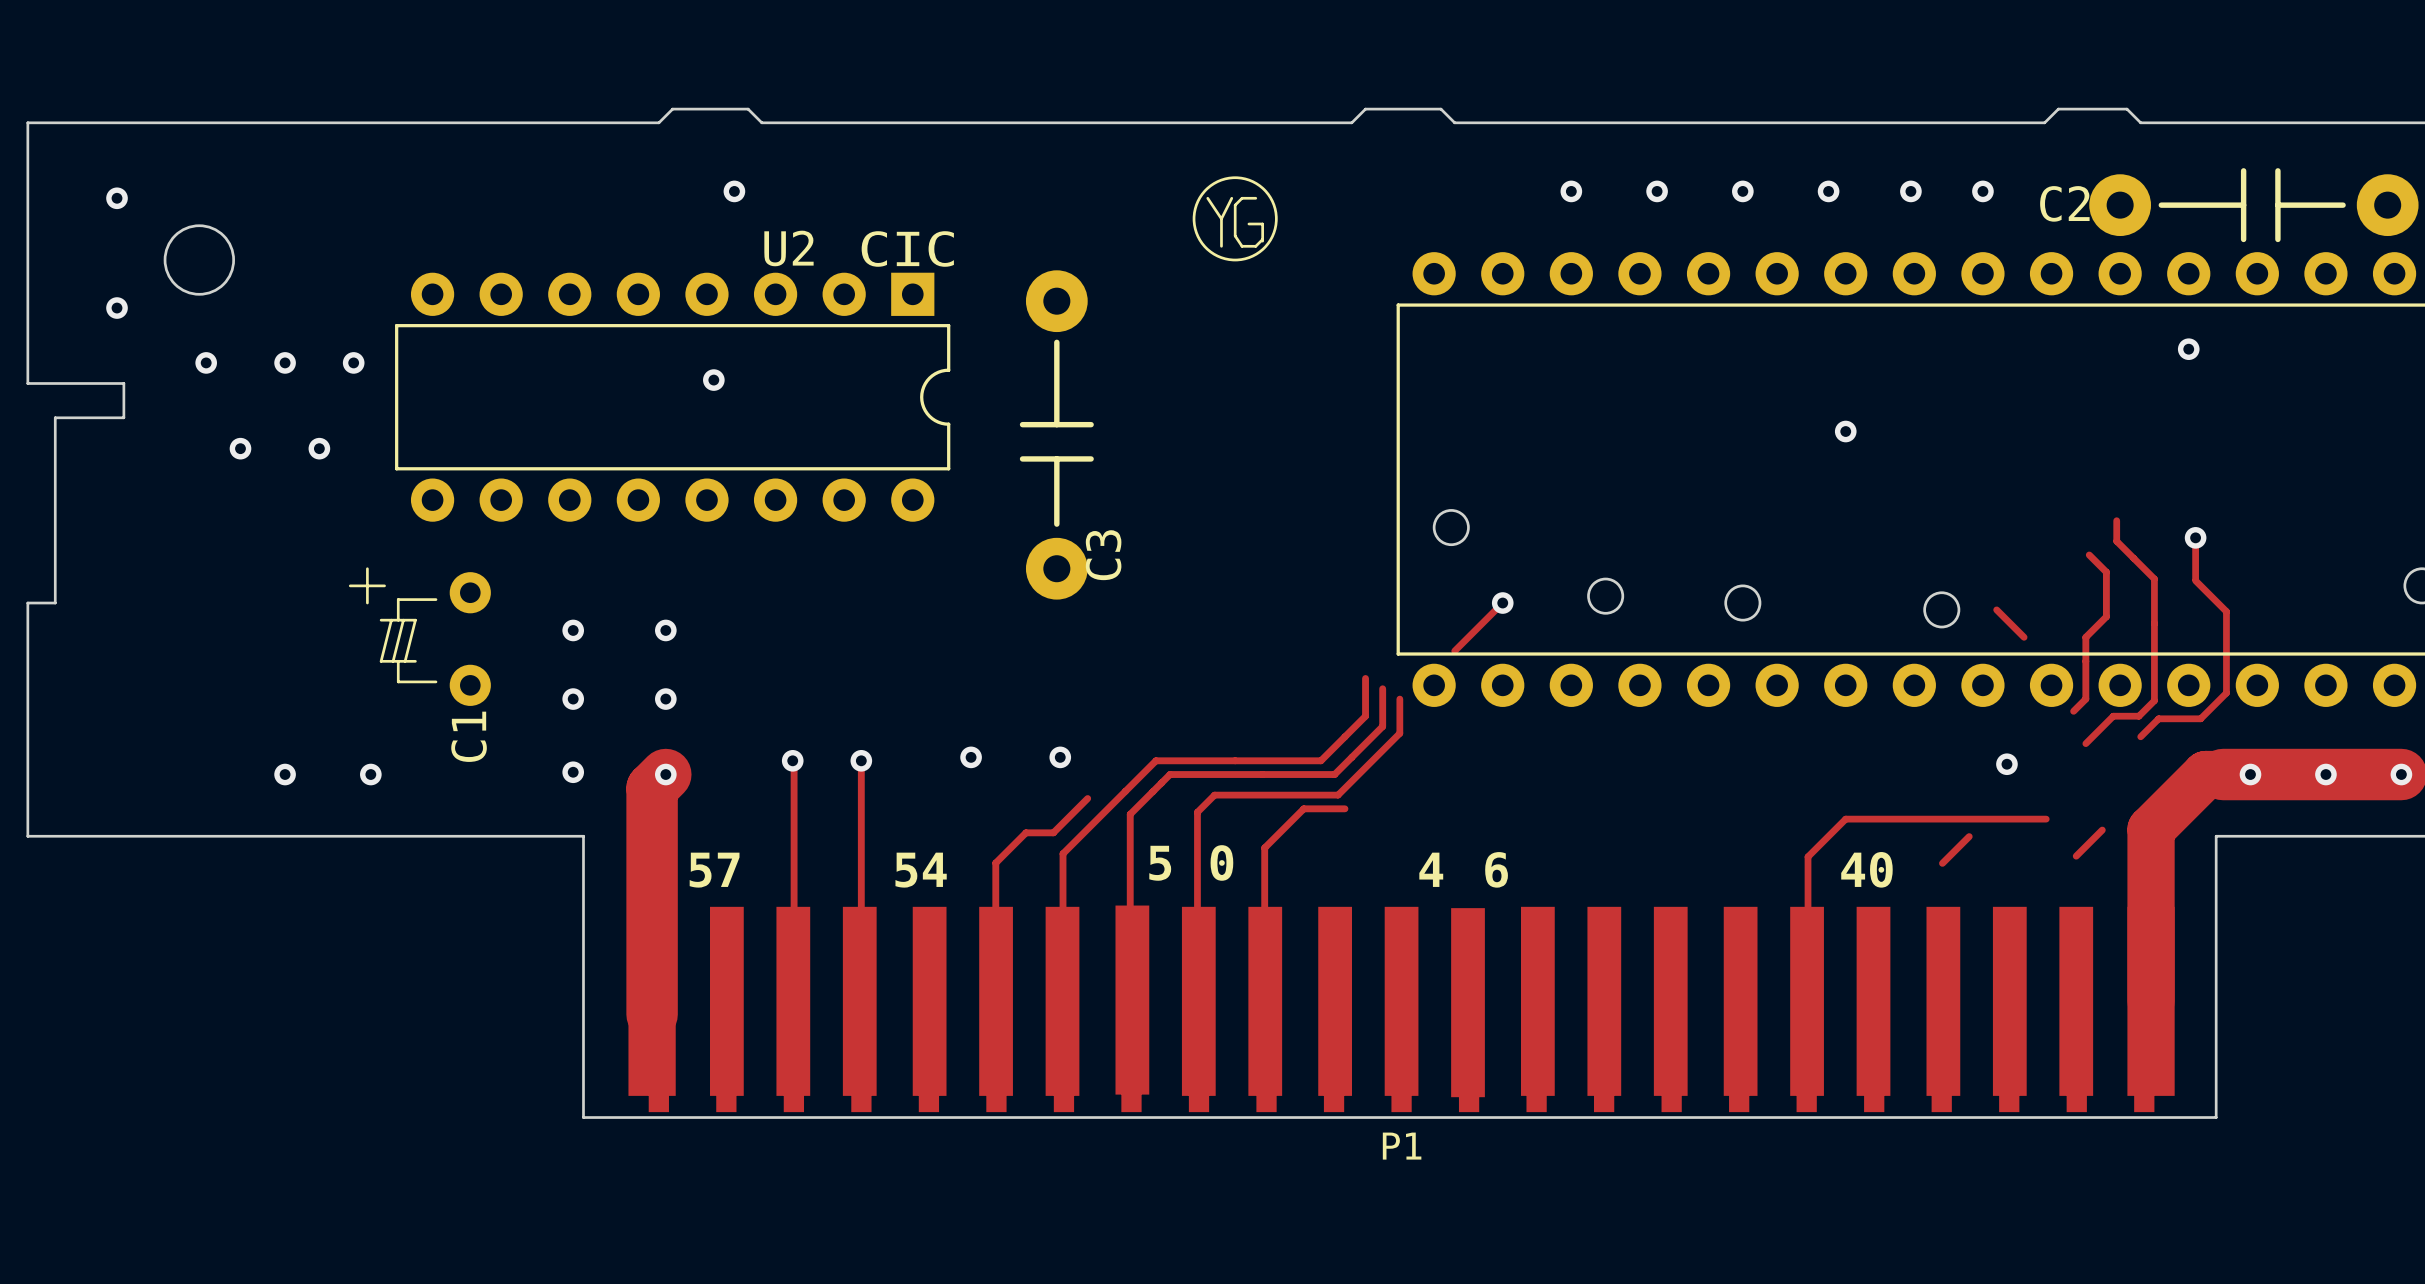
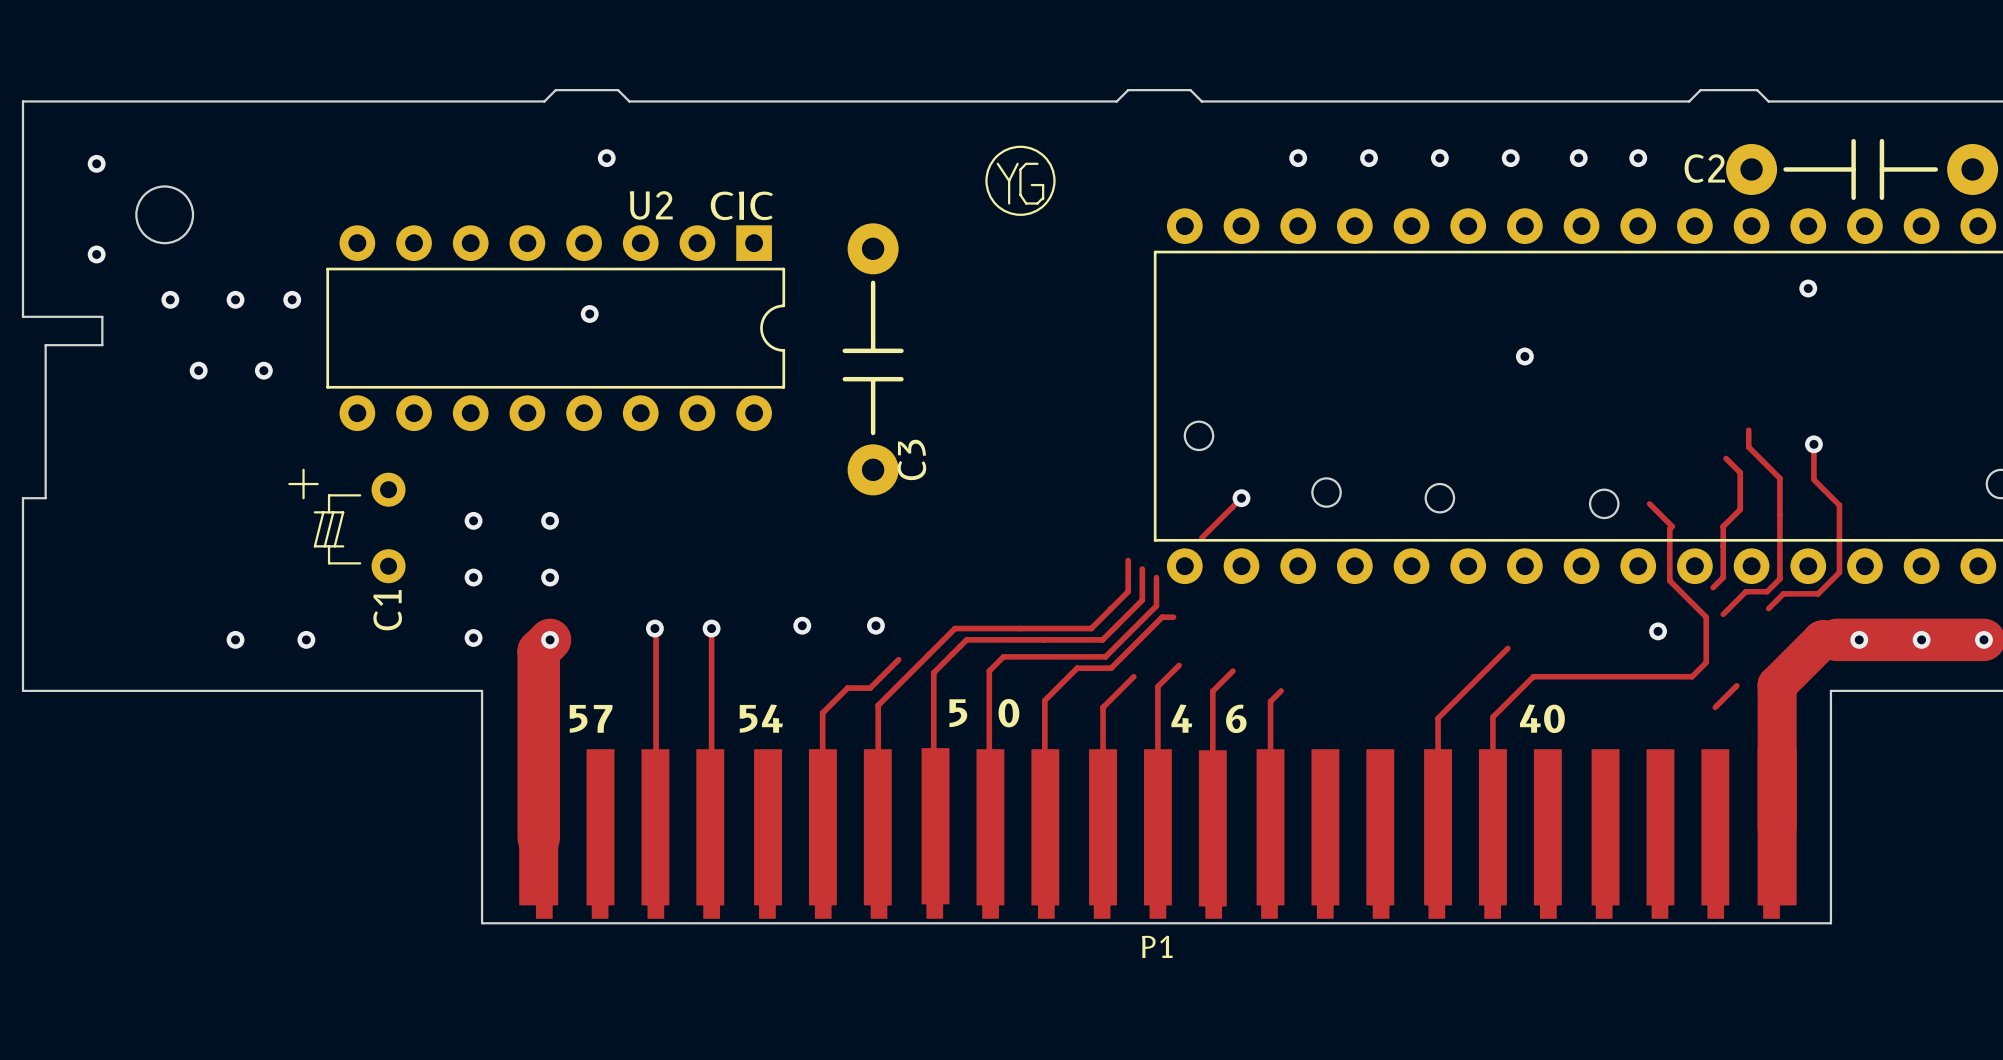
track: none -> (1672, 526) (1669, 528) (1669, 580) (1706, 617) (1706, 662) (1690, 676)
track: none -> (1173, 617) (1162, 617) (1111, 668)
track: none -> (1507, 648) (1438, 718) (1438, 827)
track: none -> (1179, 665) (1157, 686) (1157, 827)
track: none -> (1233, 671) (1212, 691) (1212, 828)
track: none -> (1133, 676) (1103, 707) (1103, 827)
track: (1856, 819) (1845, 819) (1808, 856) (1808, 1021) -> (1533, 676) (1492, 717) (1492, 827)
track: none -> (1281, 690) (1270, 701) (1270, 827)
track: (1969, 836) (1942, 863) -> none

